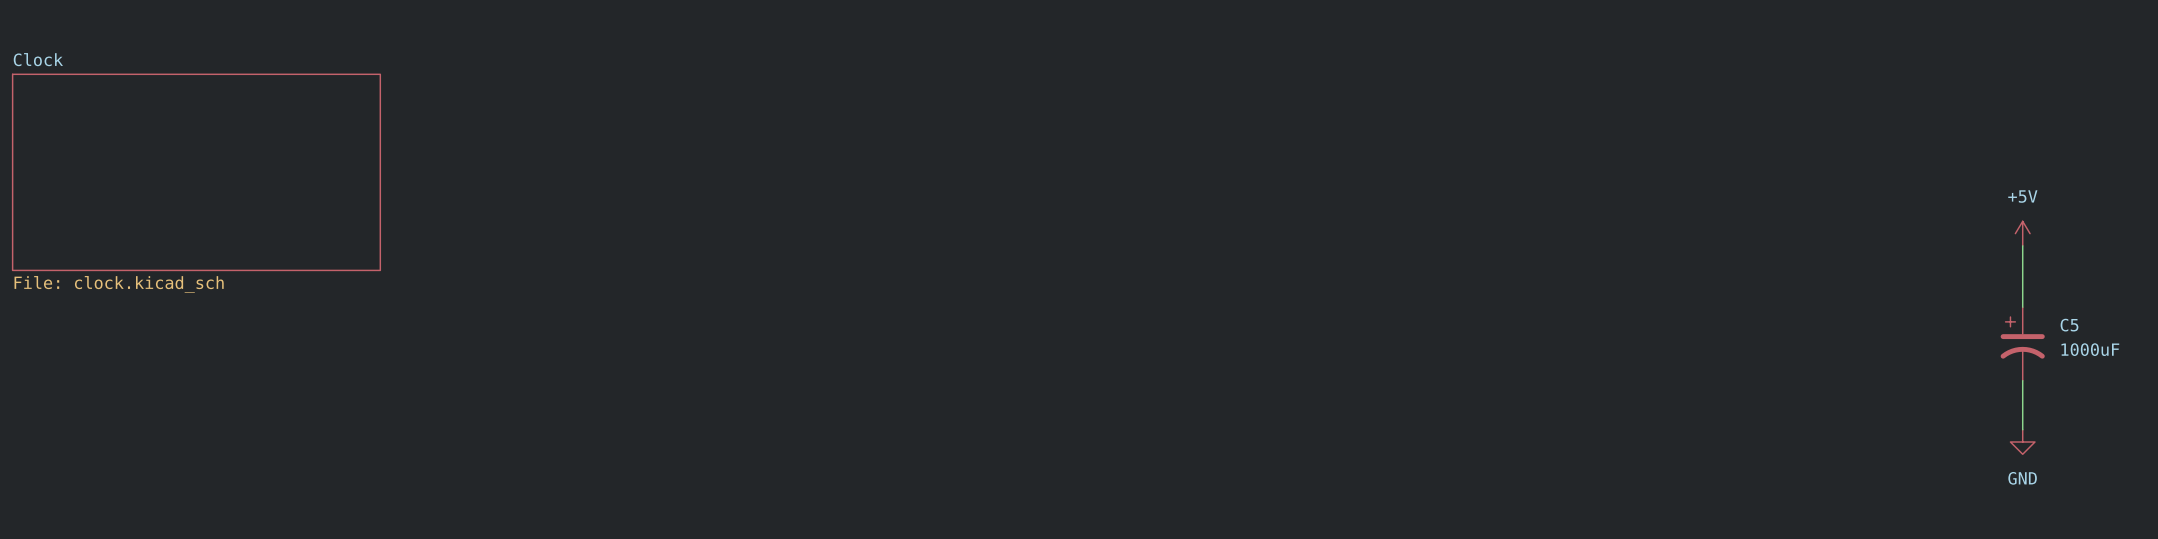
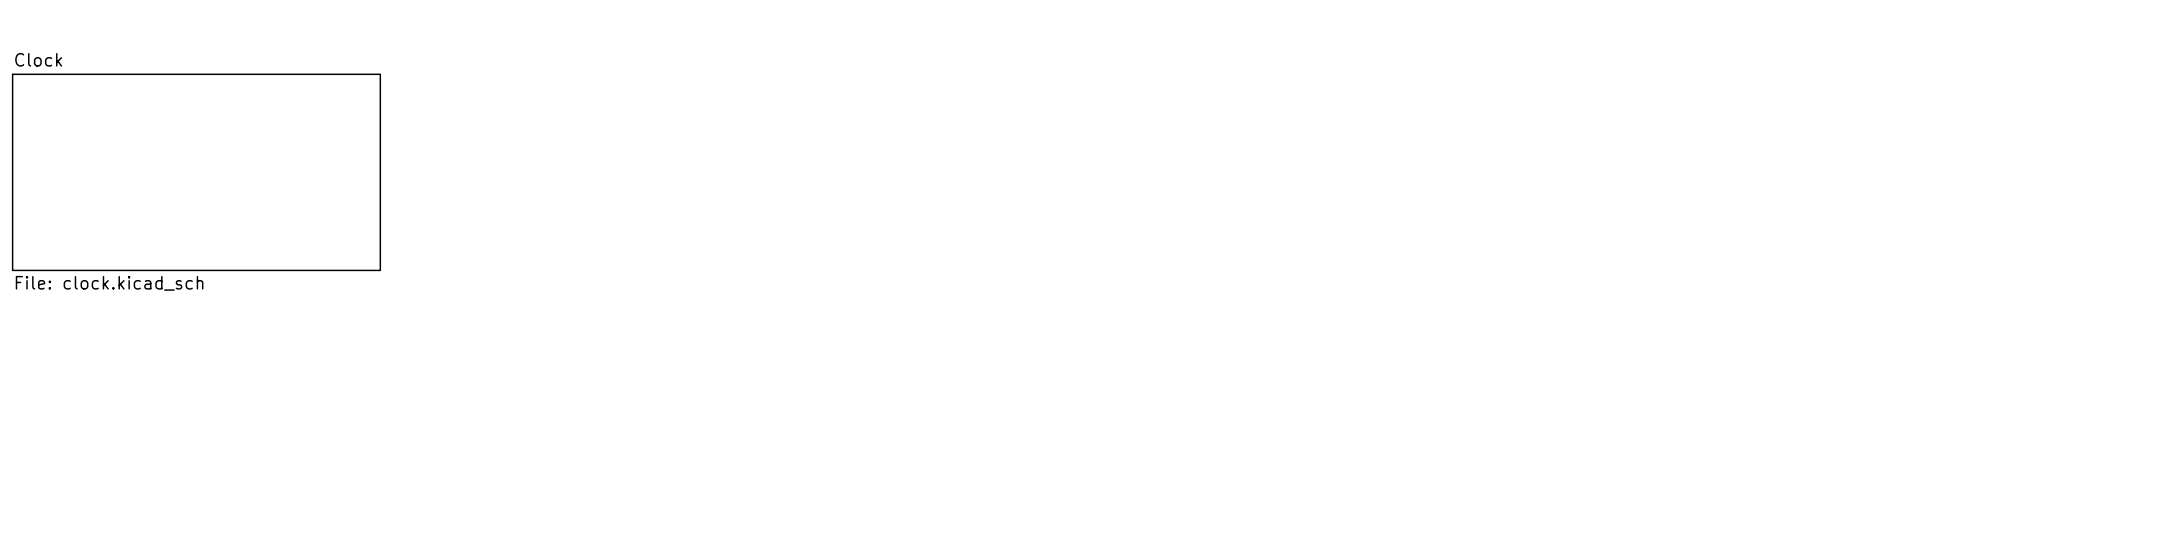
power symbol: +5V (2022, 233) -> none
wire: (2022, 245) (2022, 307) -> none
C5: 1000uF (2022, 343) -> none
wire: (2022, 380) (2022, 429) -> none
power symbol: GND (2022, 442) -> none

